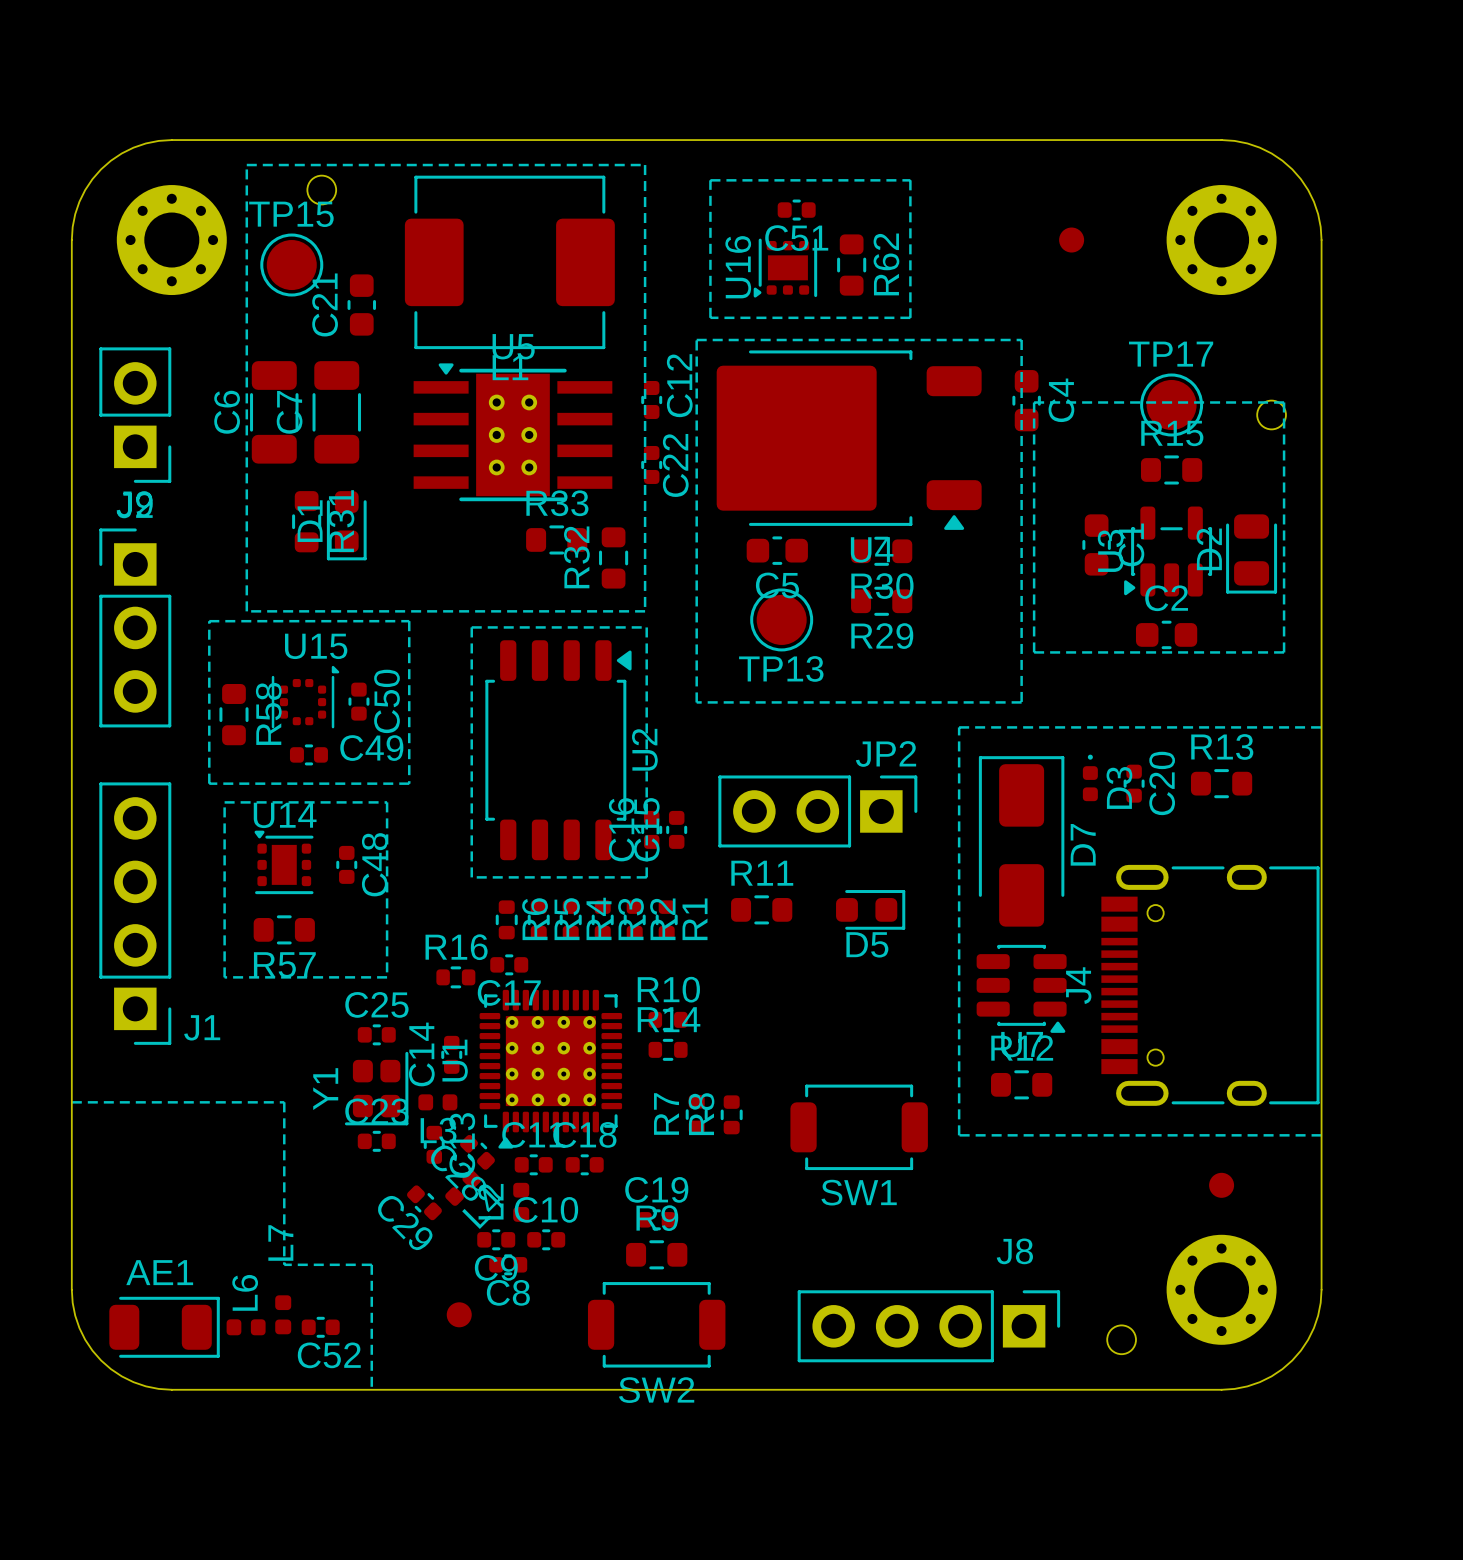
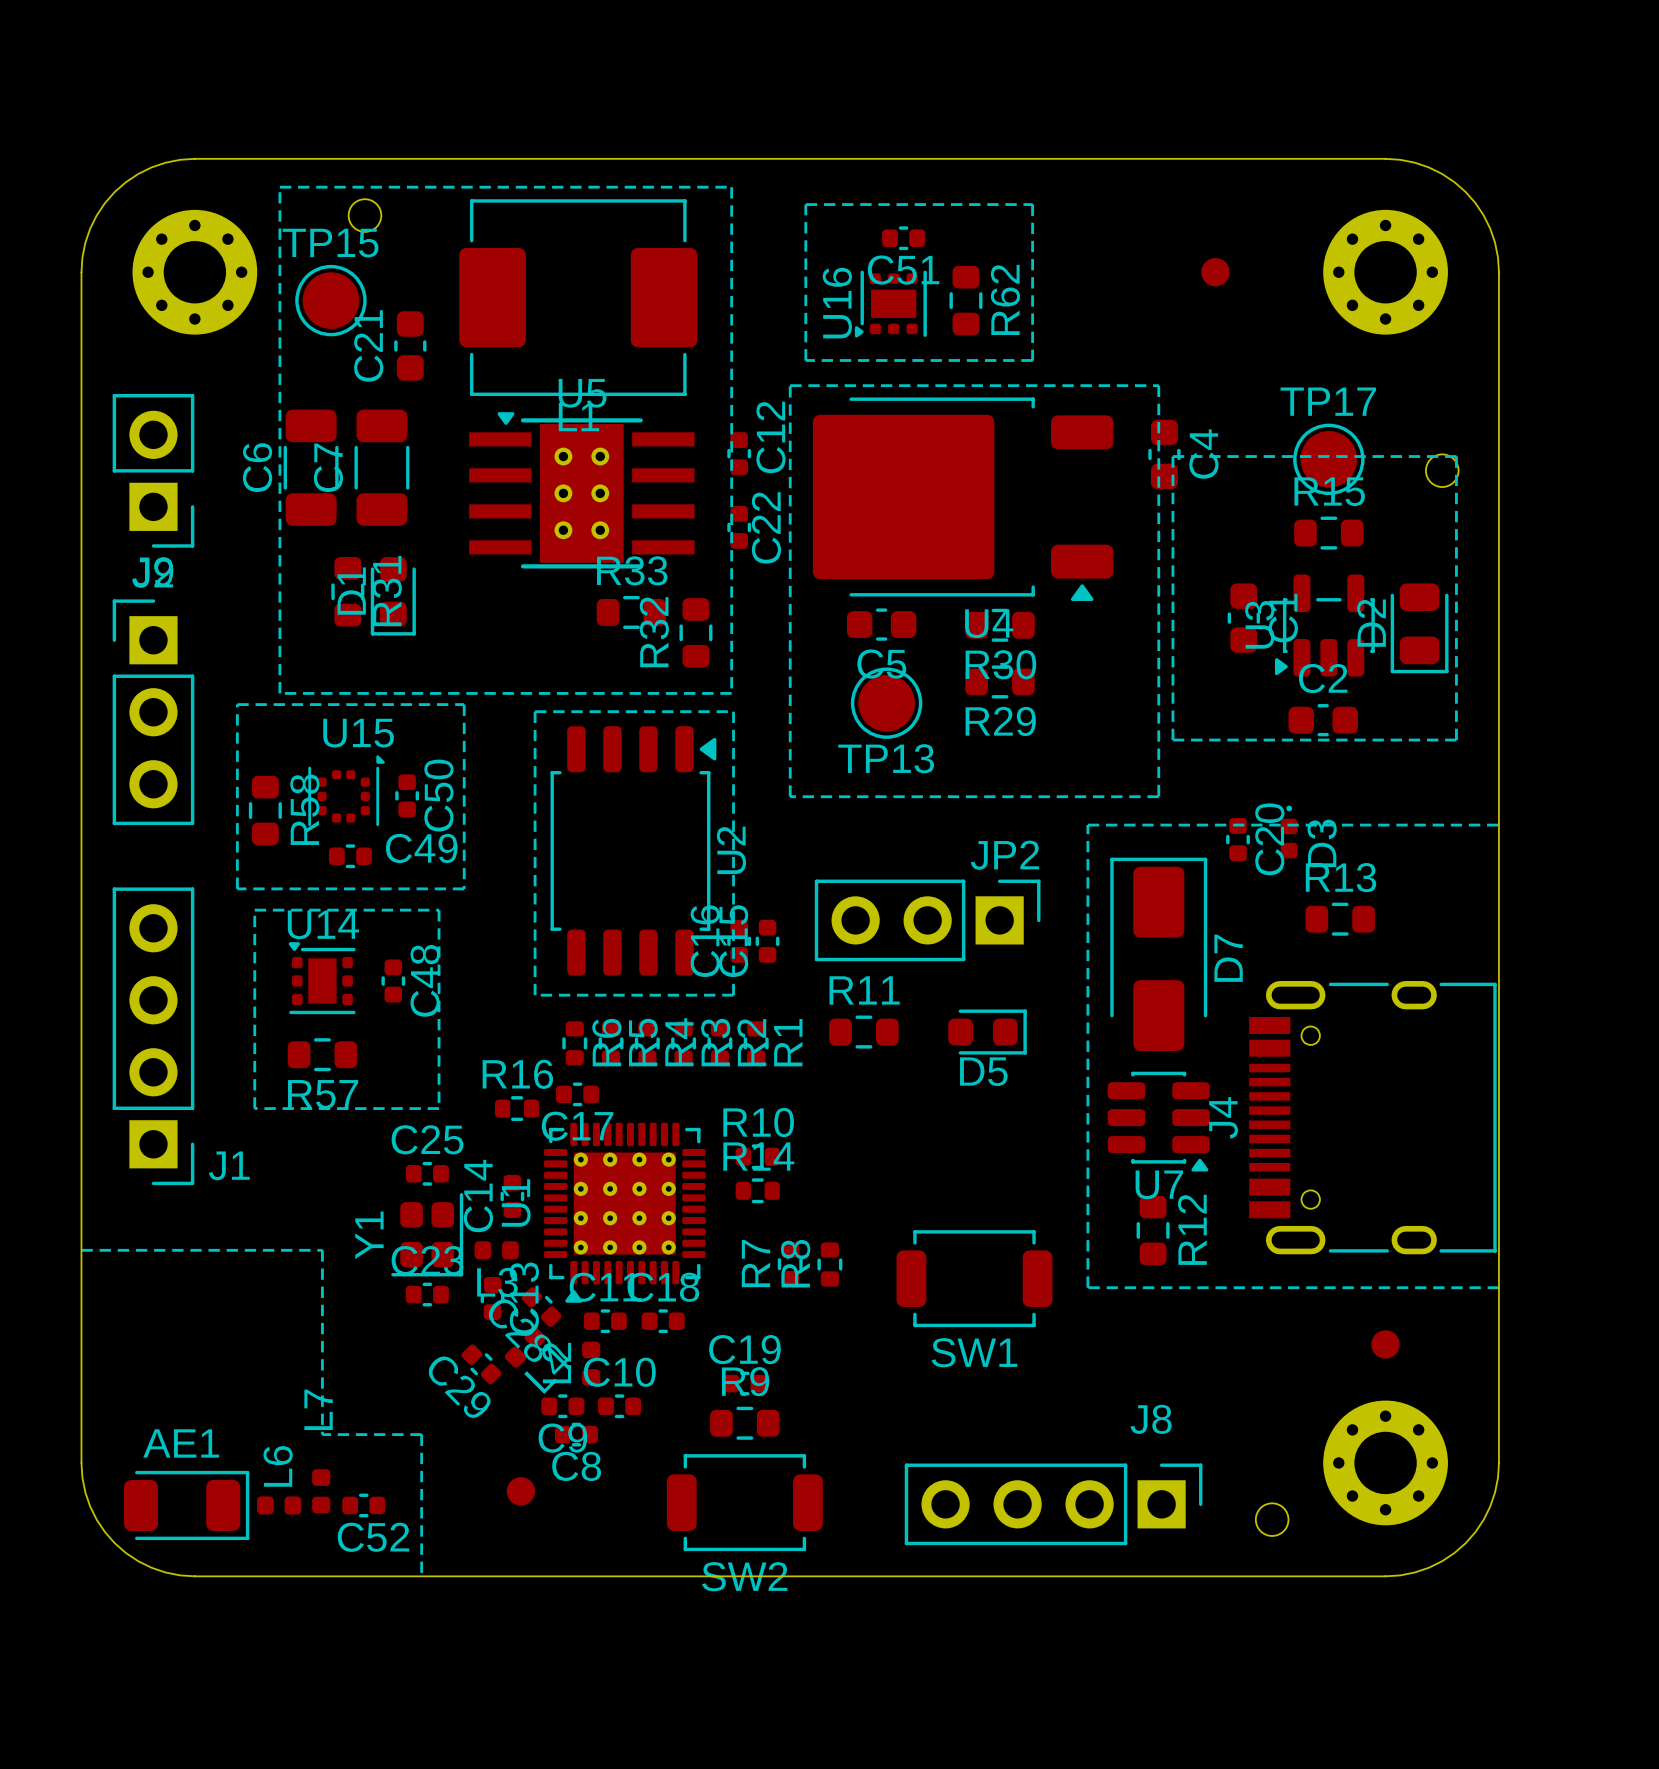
D3 position: (1090, 777) -> (1289, 832)
C20 position: (1134, 783) -> (1238, 839)
R13 position: (1221, 783) -> (1340, 919)
R12 rotation: 0° (1021, 1084) -> 90° clockwise (1153, 1230)

